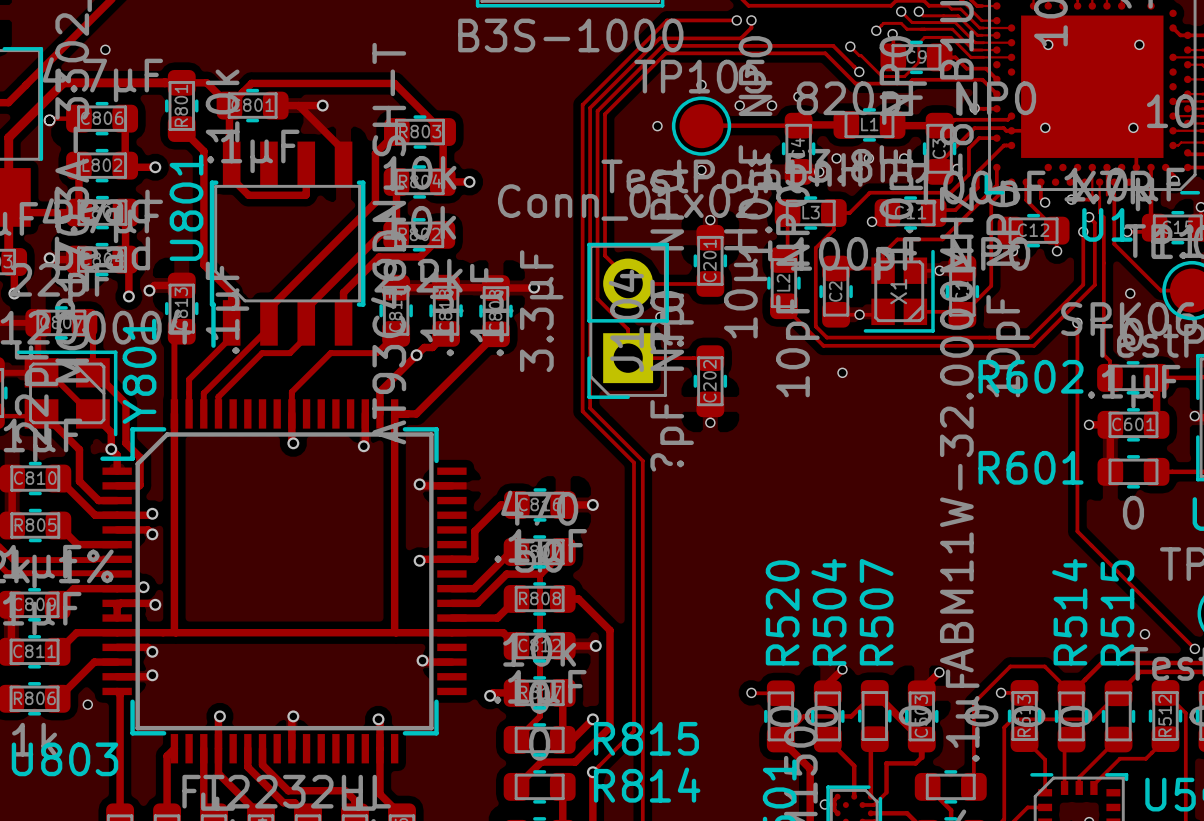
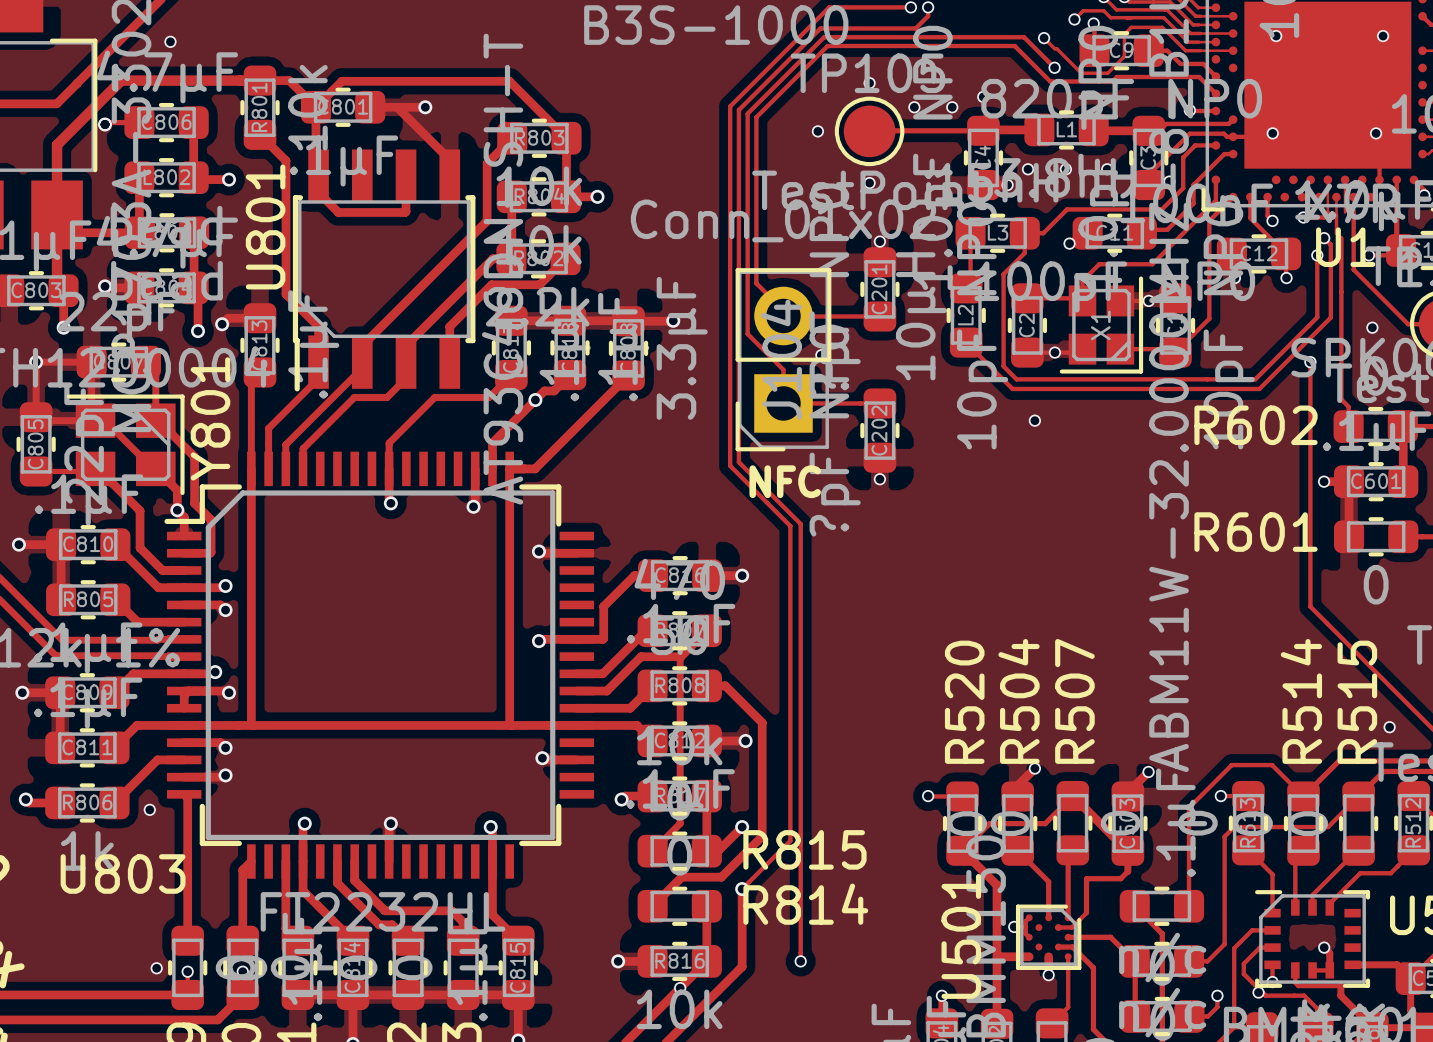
text: none -> NFC (785, 481)

